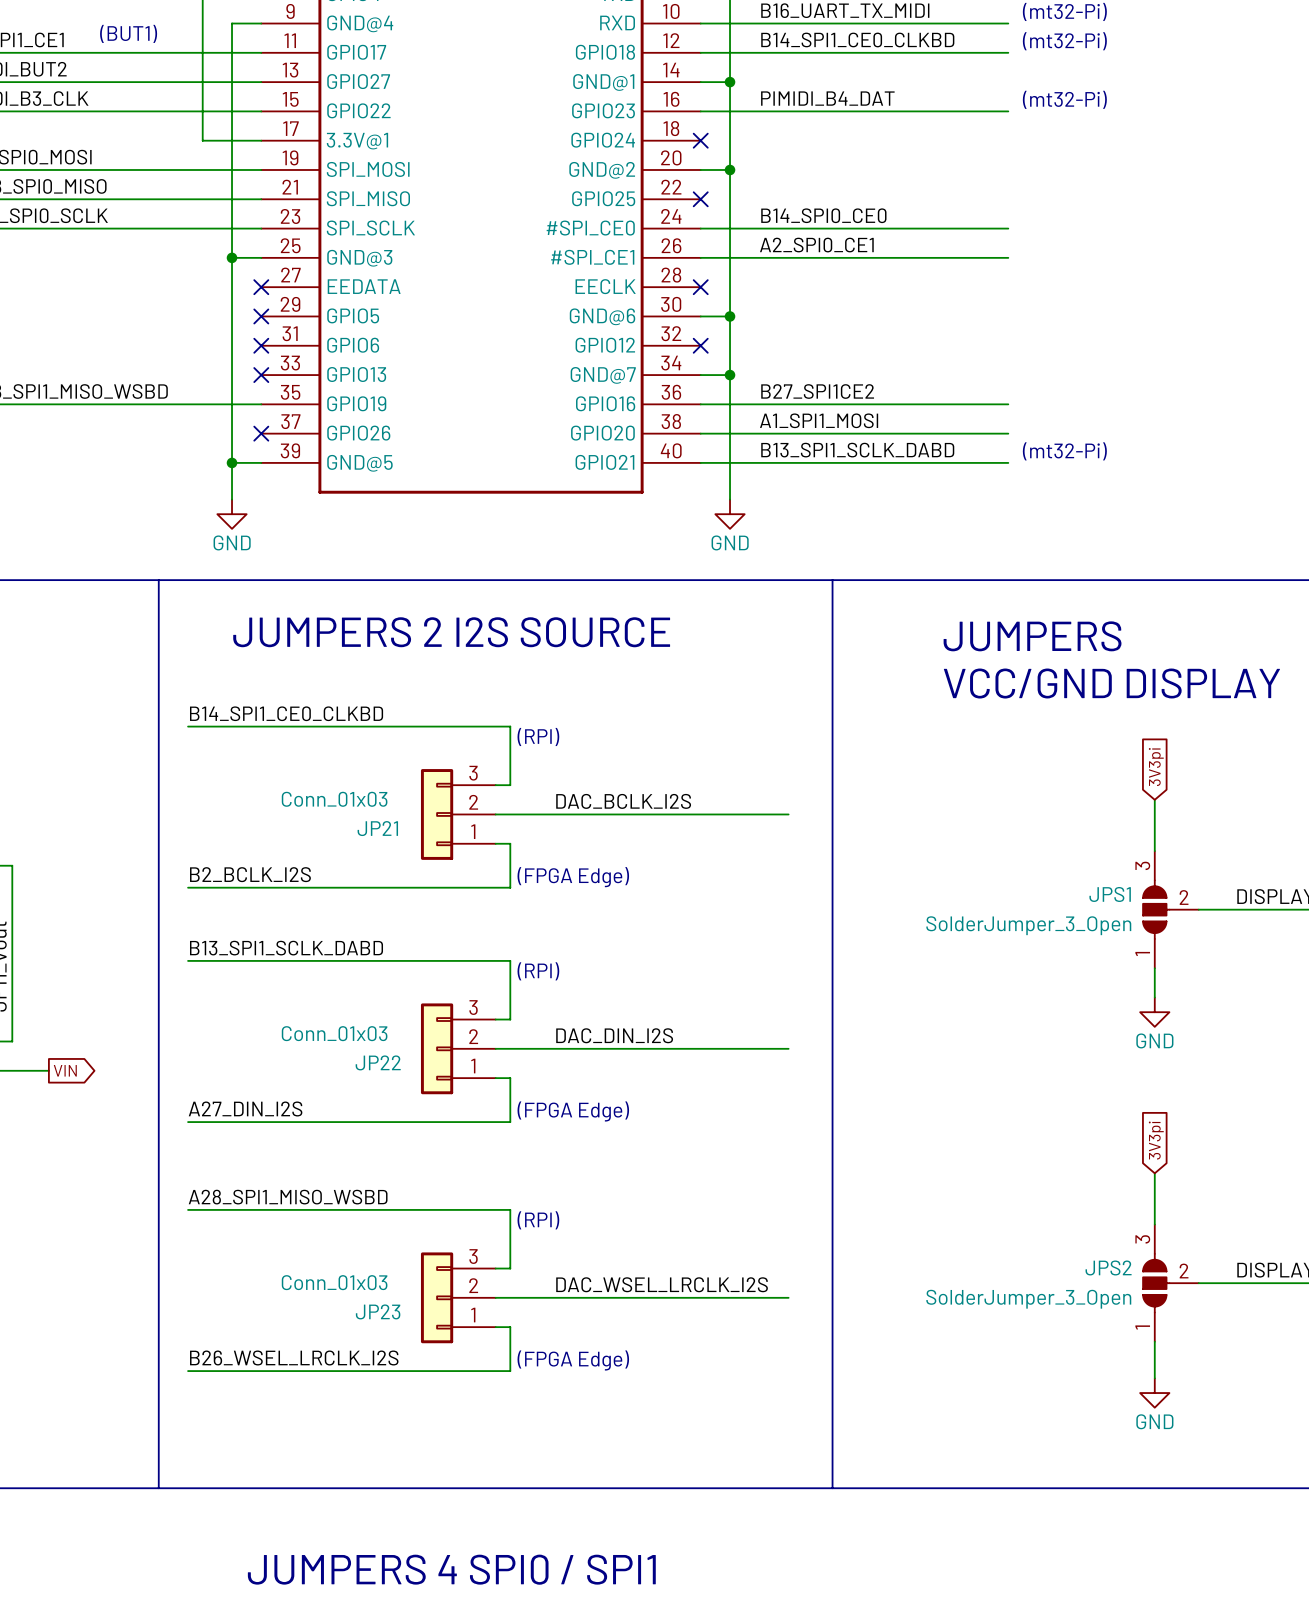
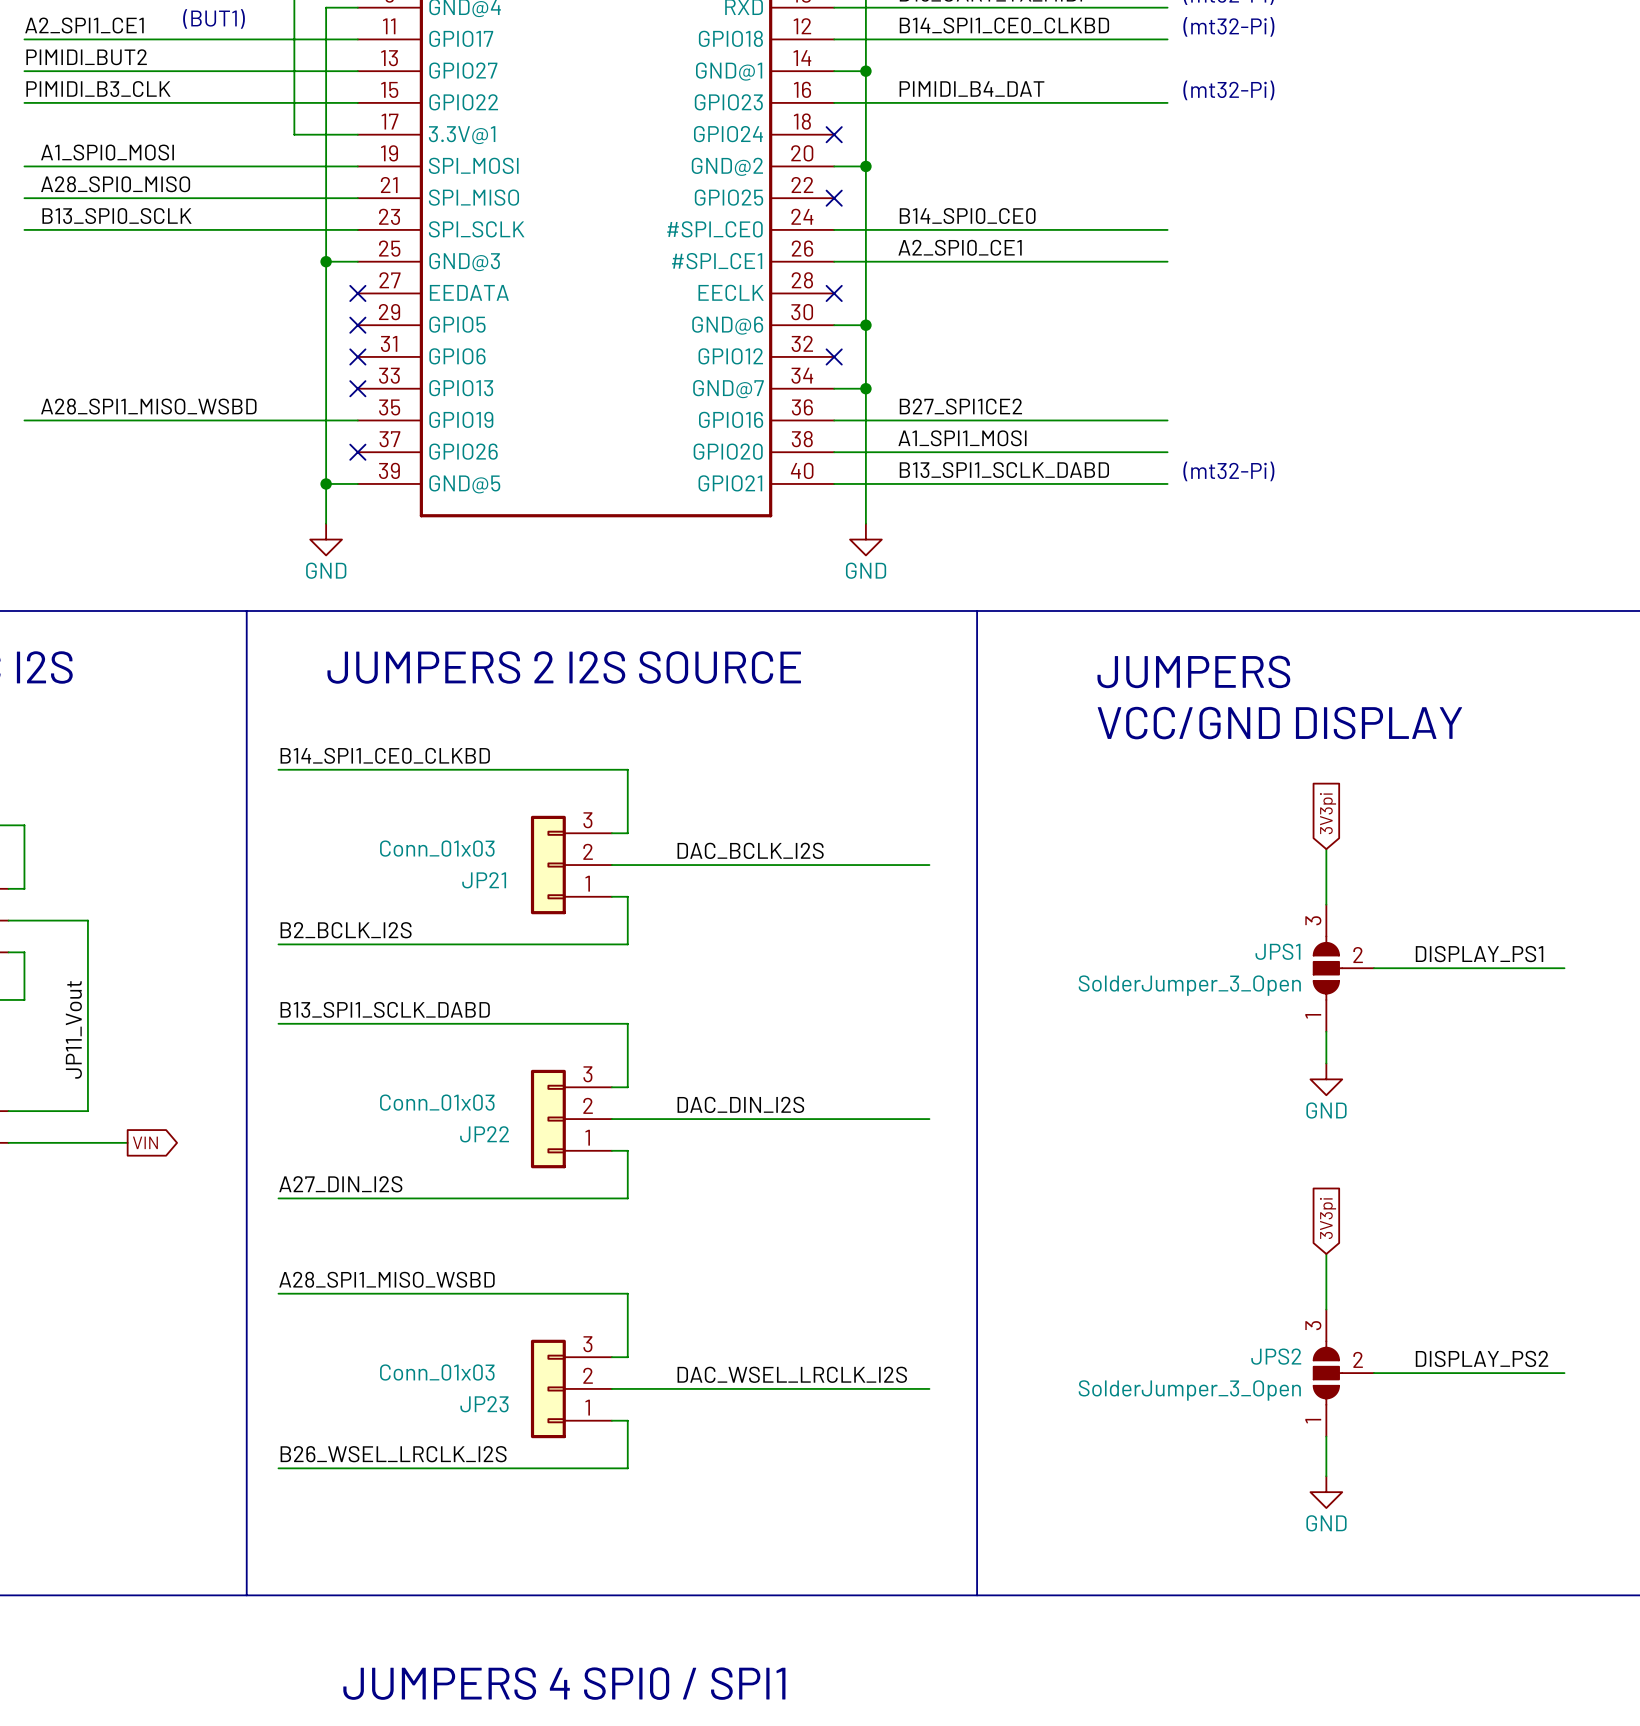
text: (RPI) (538, 736) -> none
text: (FPGA Edge) (573, 877) -> none
text: (RPI) (538, 971) -> none
text: (FPGA Edge) (573, 1111) -> none
text: (RPI) (538, 1220) -> none
text: (FPGA Edge) (573, 1360) -> none

